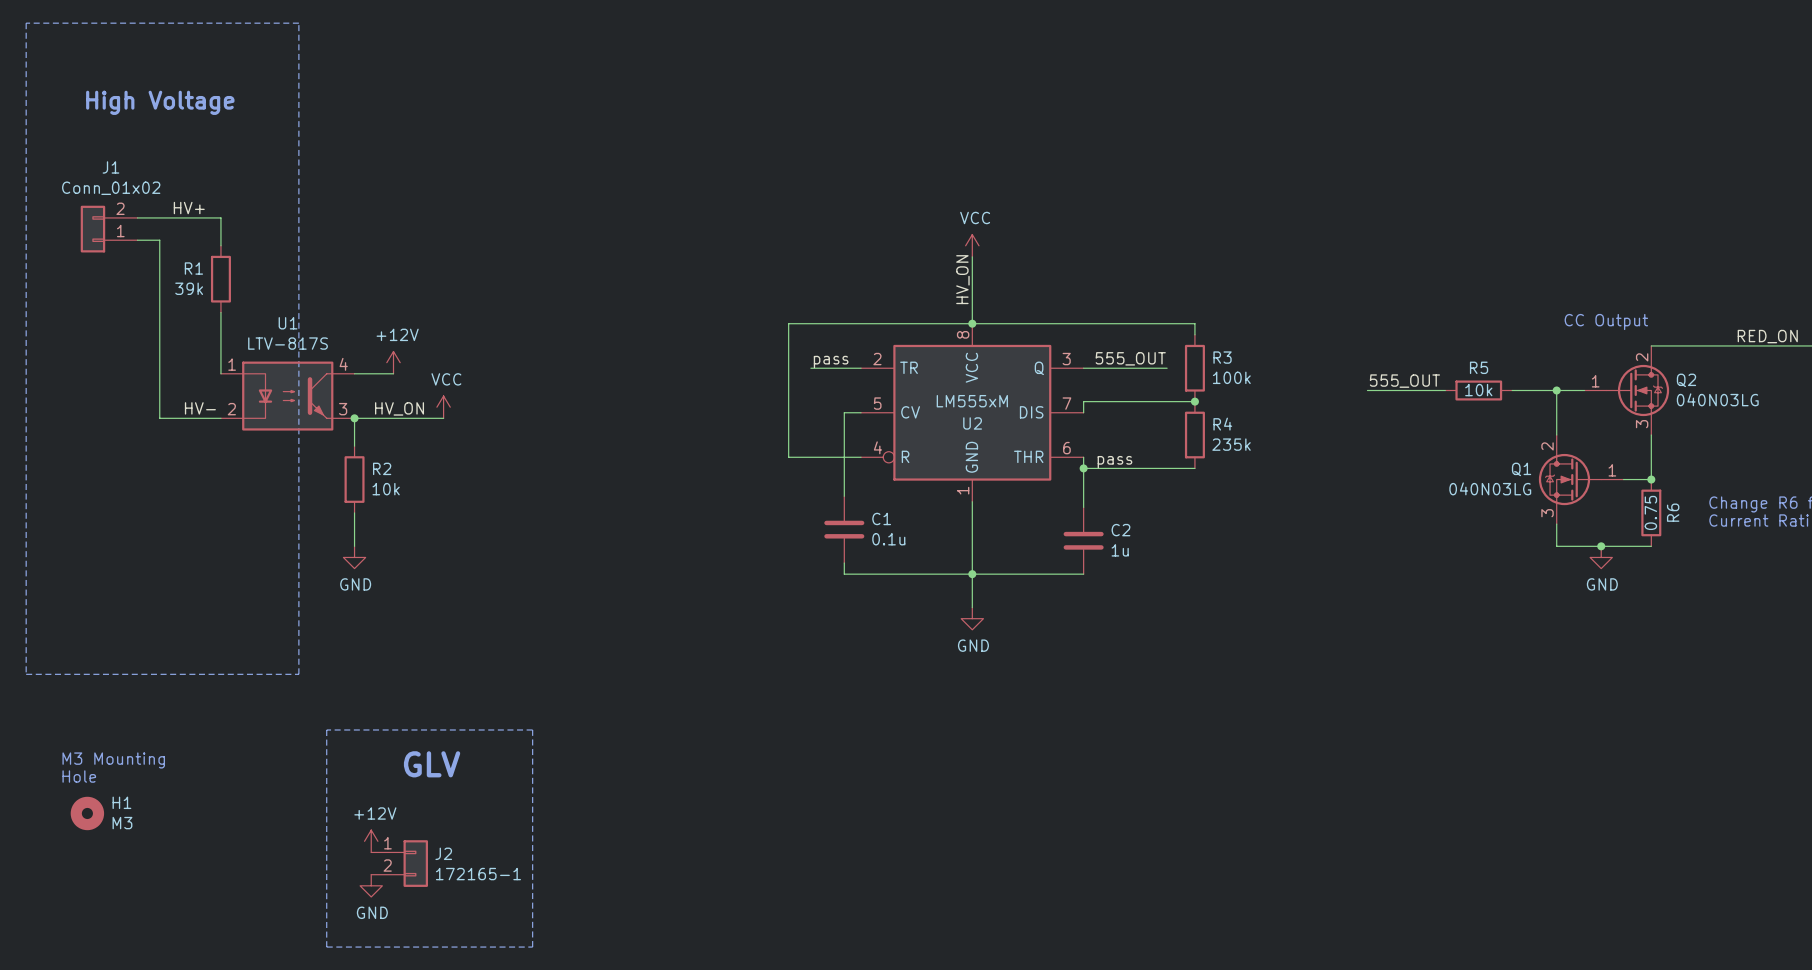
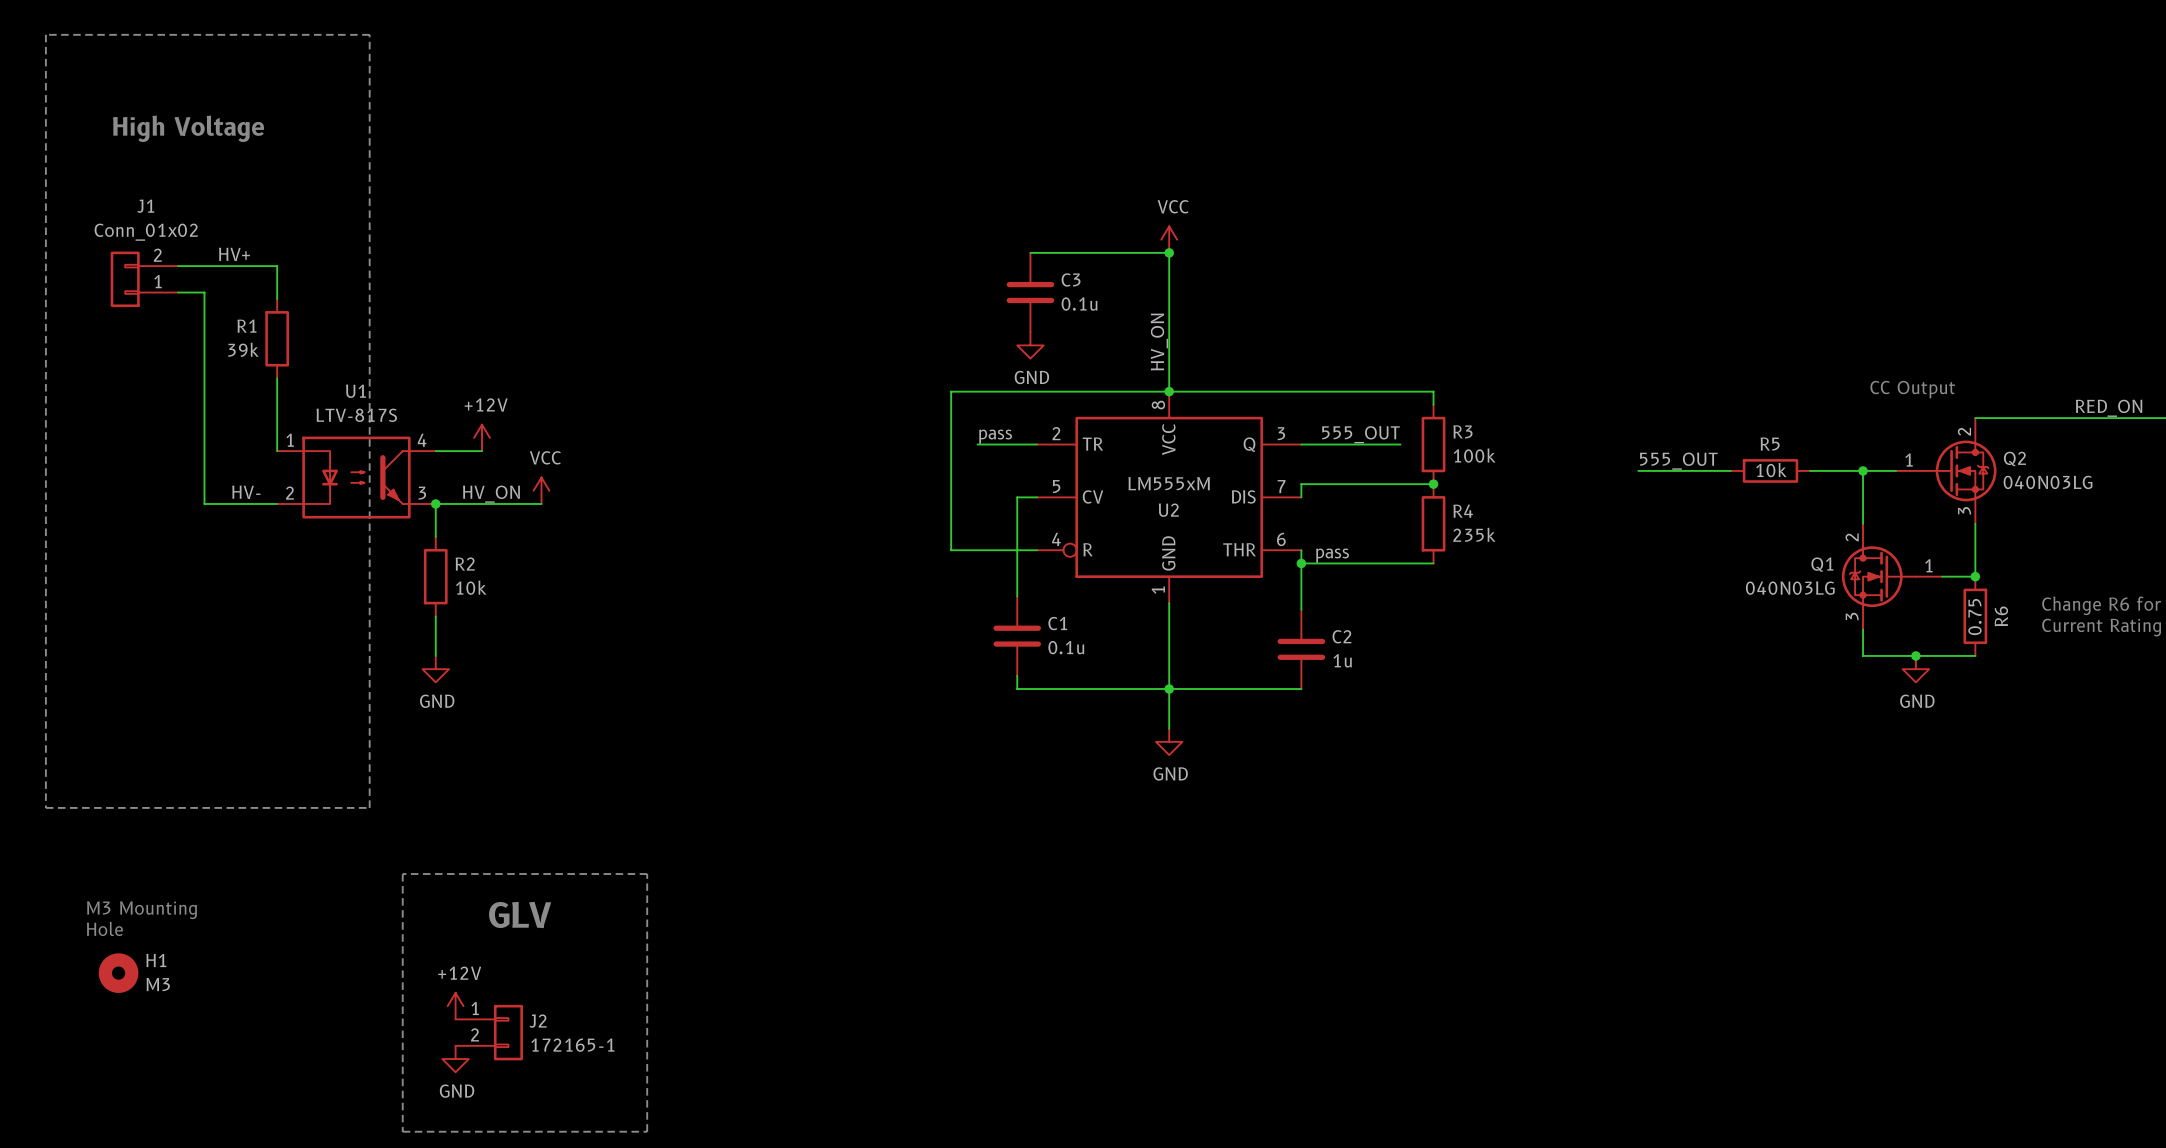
wire: none -> (1030, 252) (1169, 252) (1169, 312)
junction: none -> (1169, 252)
C3: none -> 0.1u (1030, 292)
power symbol position: VCC (972, 245) -> VCC (1169, 239)
power symbol: none -> GND (1030, 345)

